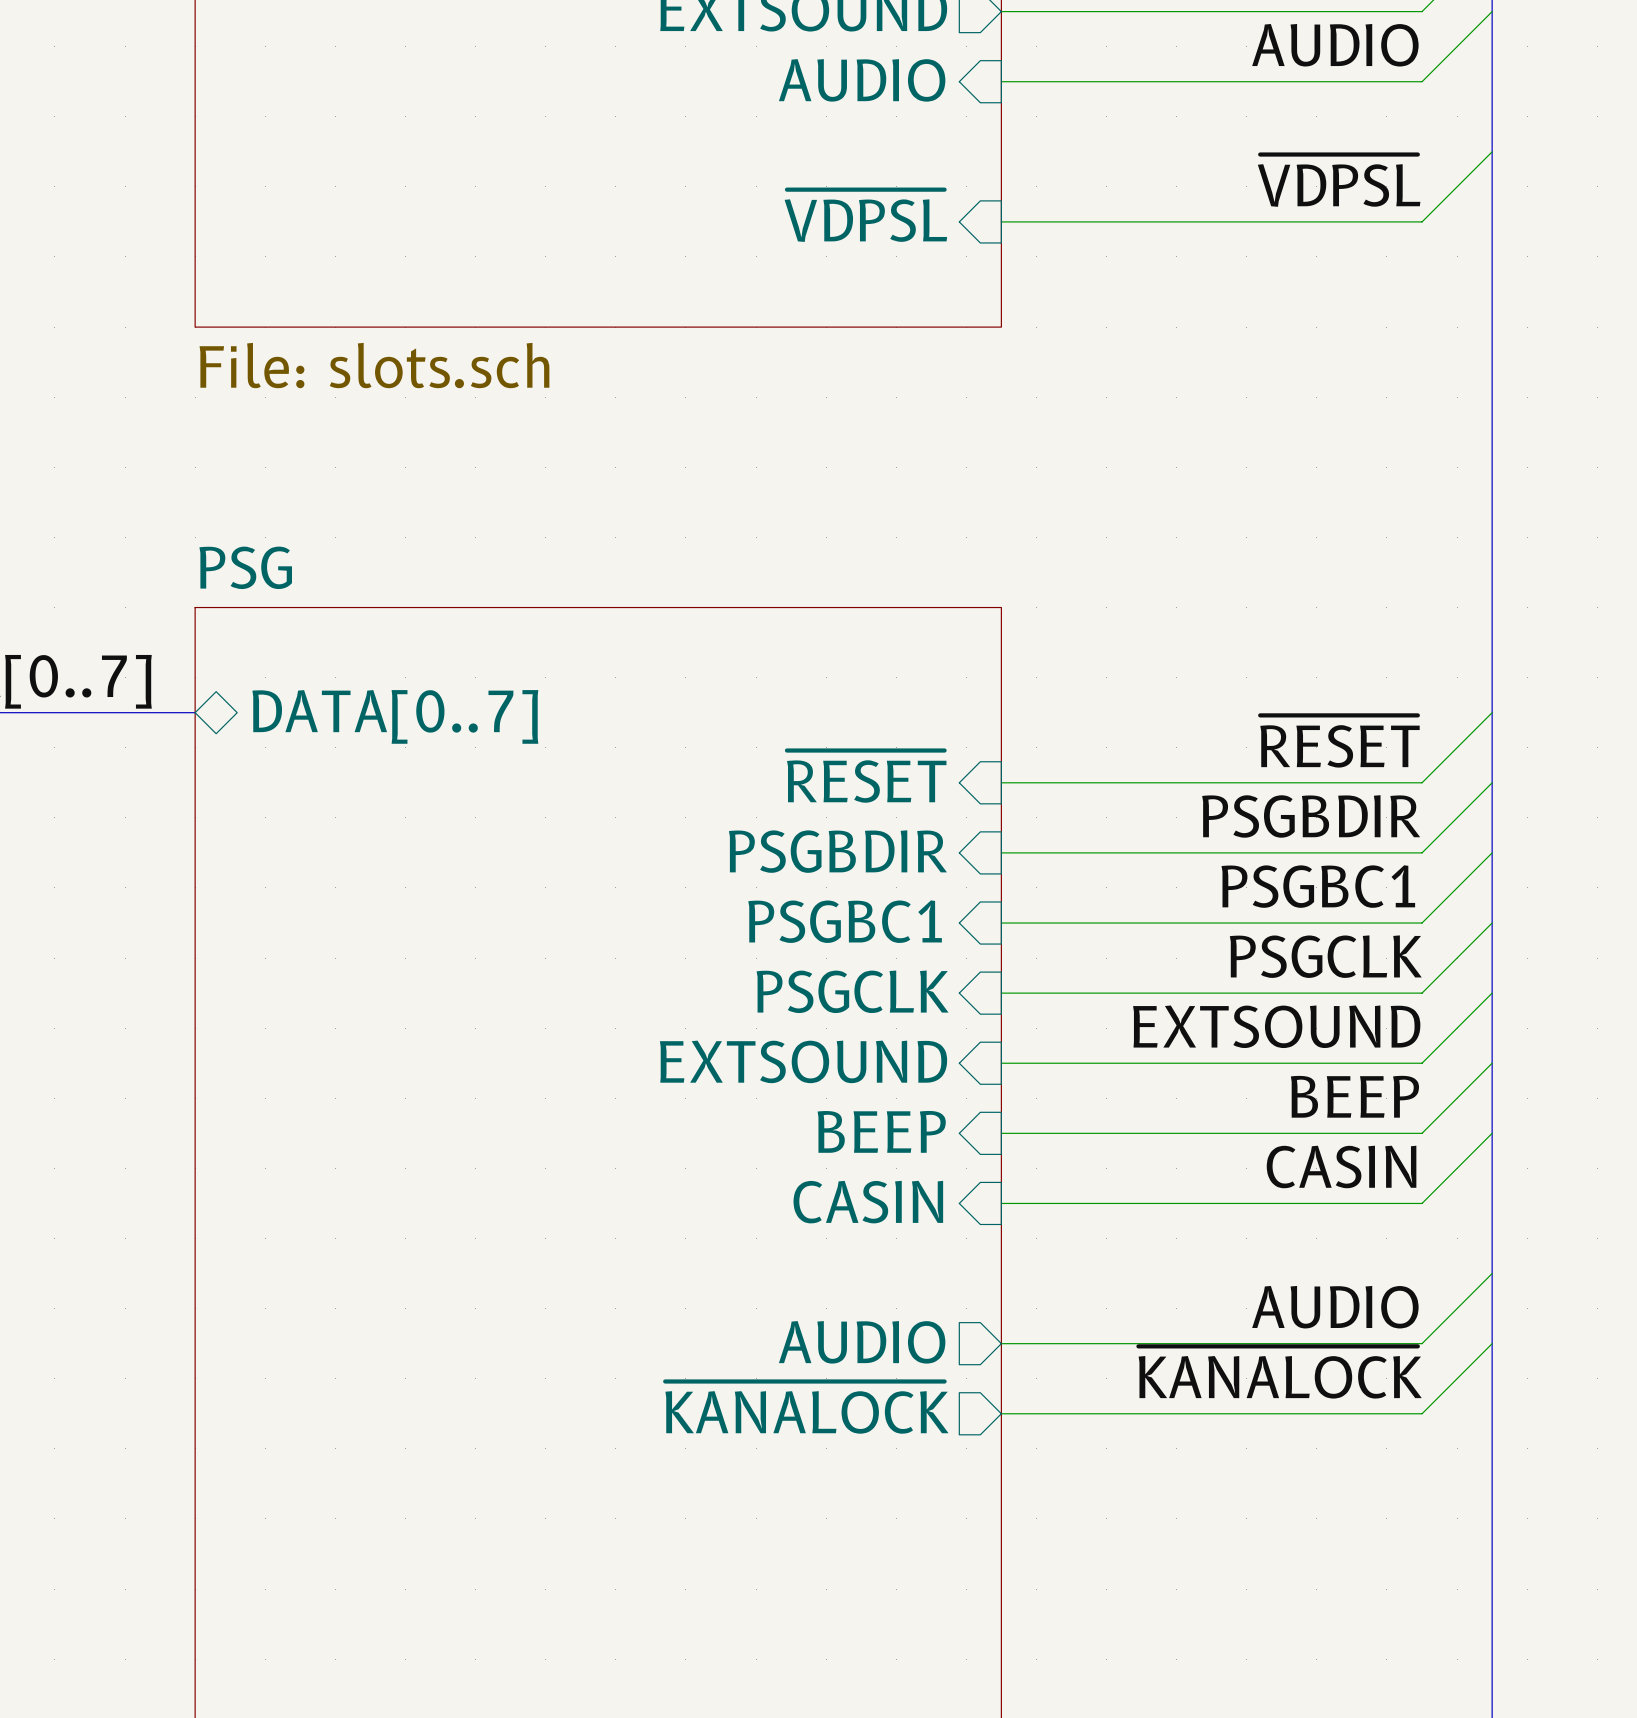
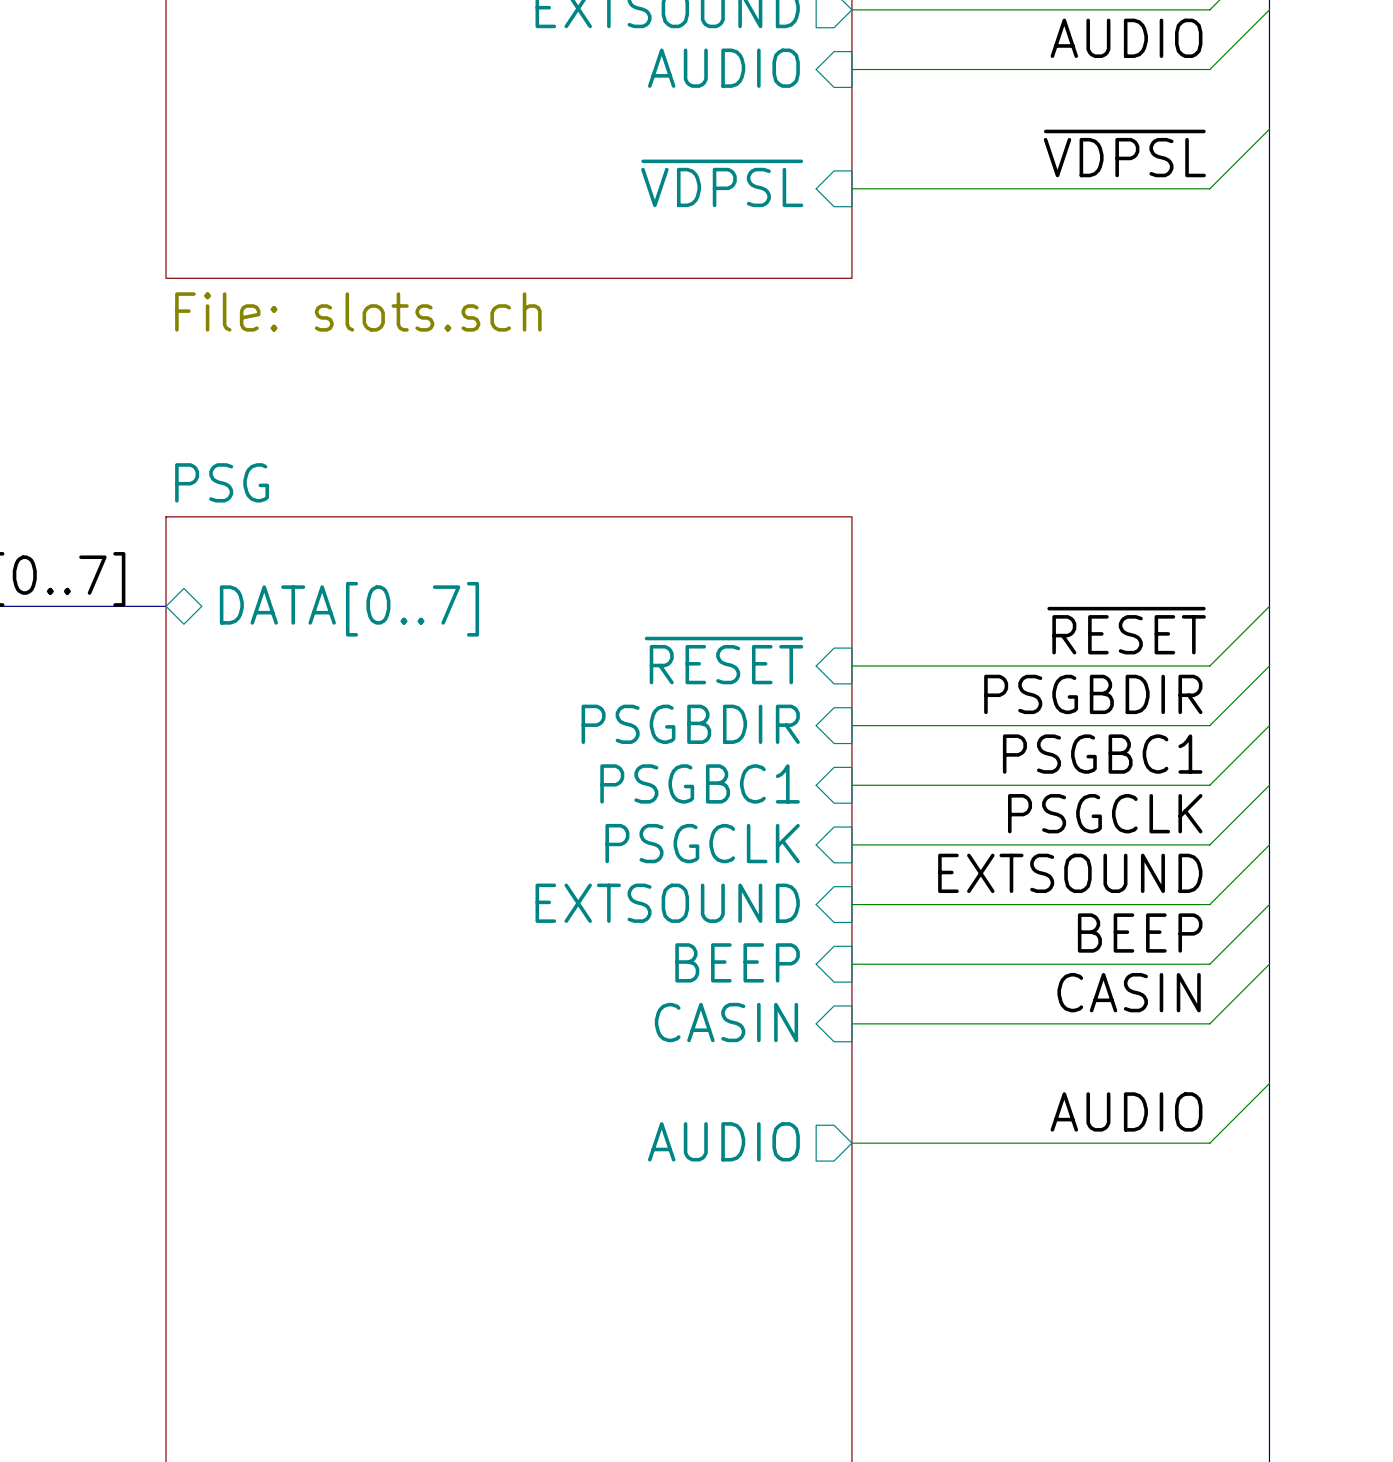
wire: (1492, 1343) (1422, 1413) (1001, 1413) -> none
label: ~{KANALOCK} (1280, 1372) -> none
sheet pin: ~{KANALOCK} (806, 1407) -> none

